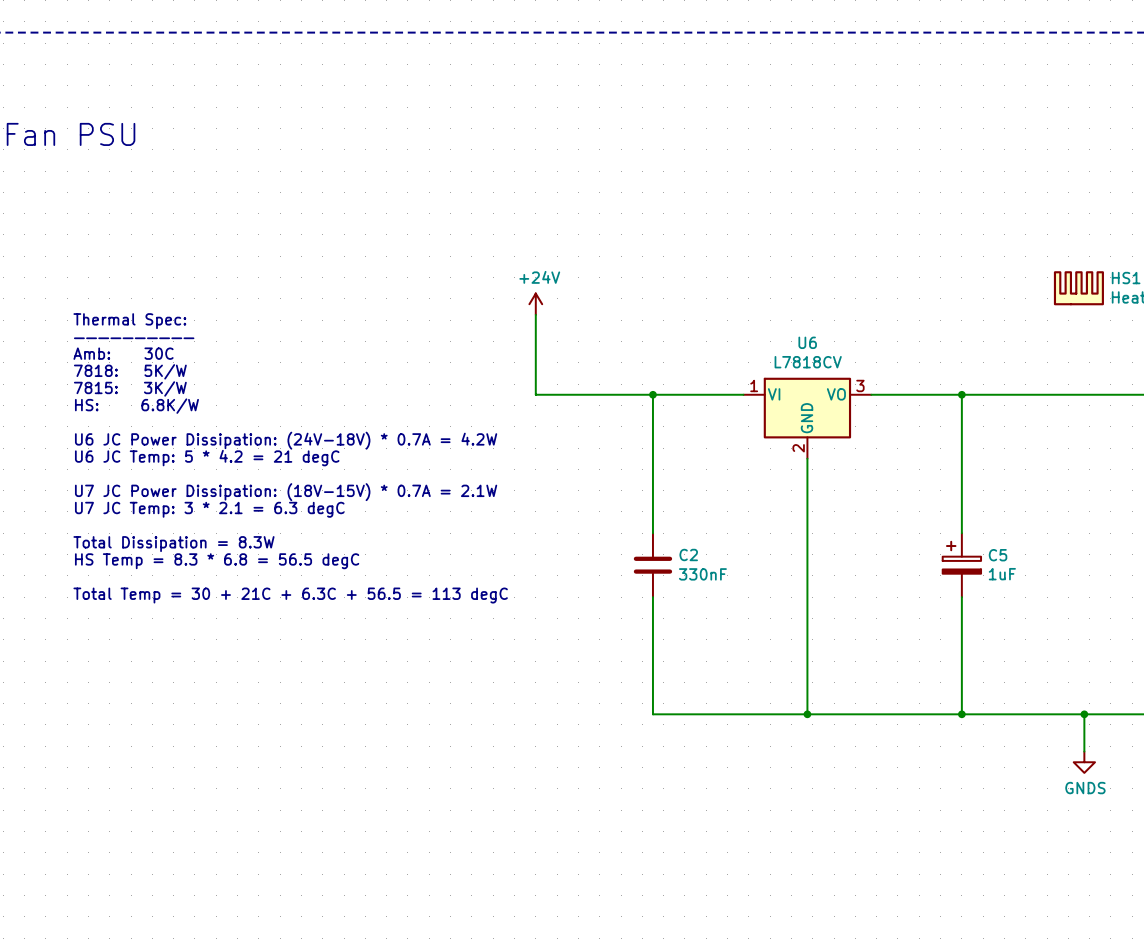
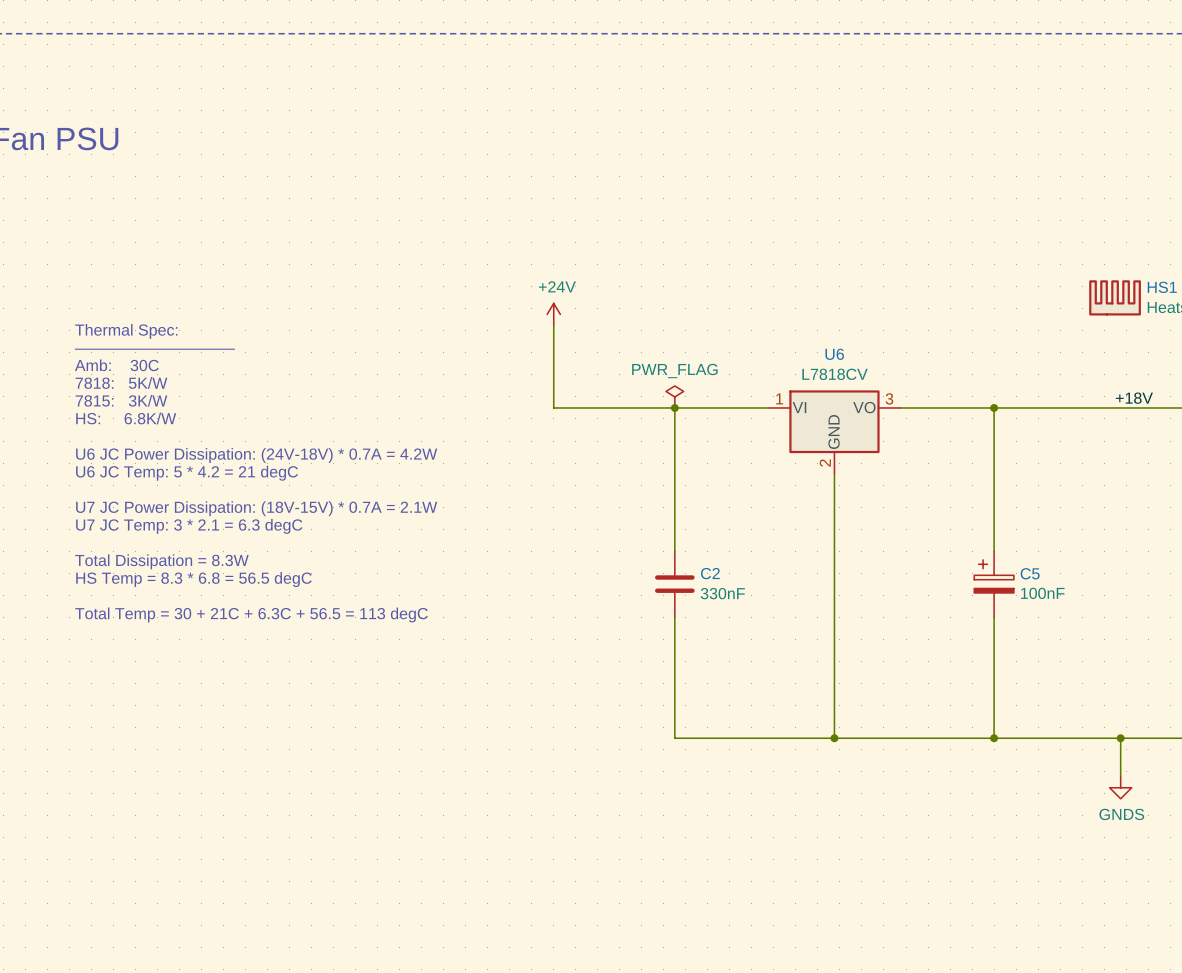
power symbol: none -> PWR_FLAG (674, 396)
label: none -> +18V (1134, 398)
C5 value: 1uF (1002, 574) -> 100nF (1042, 593)

